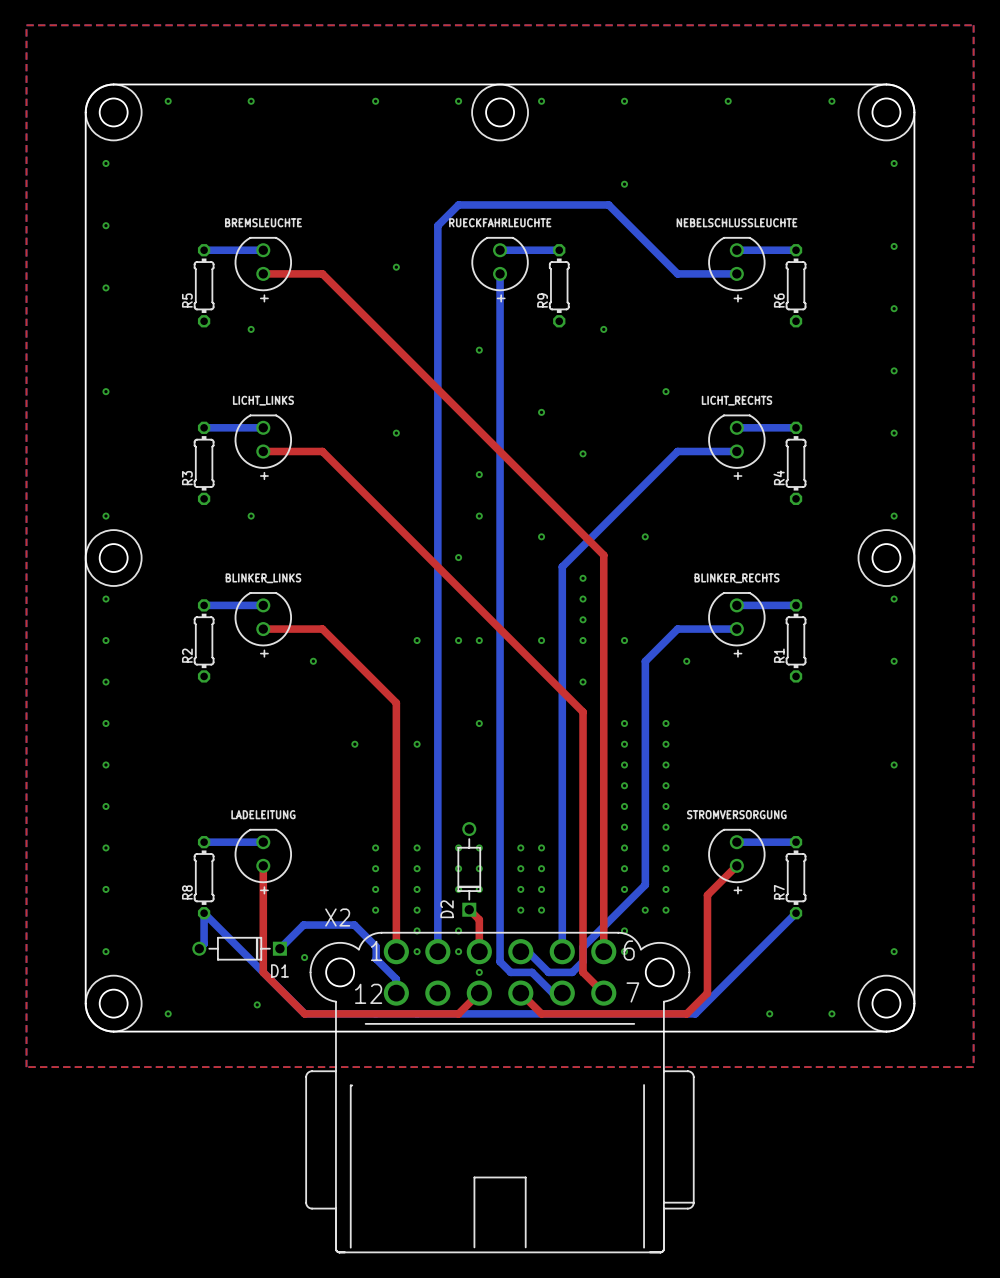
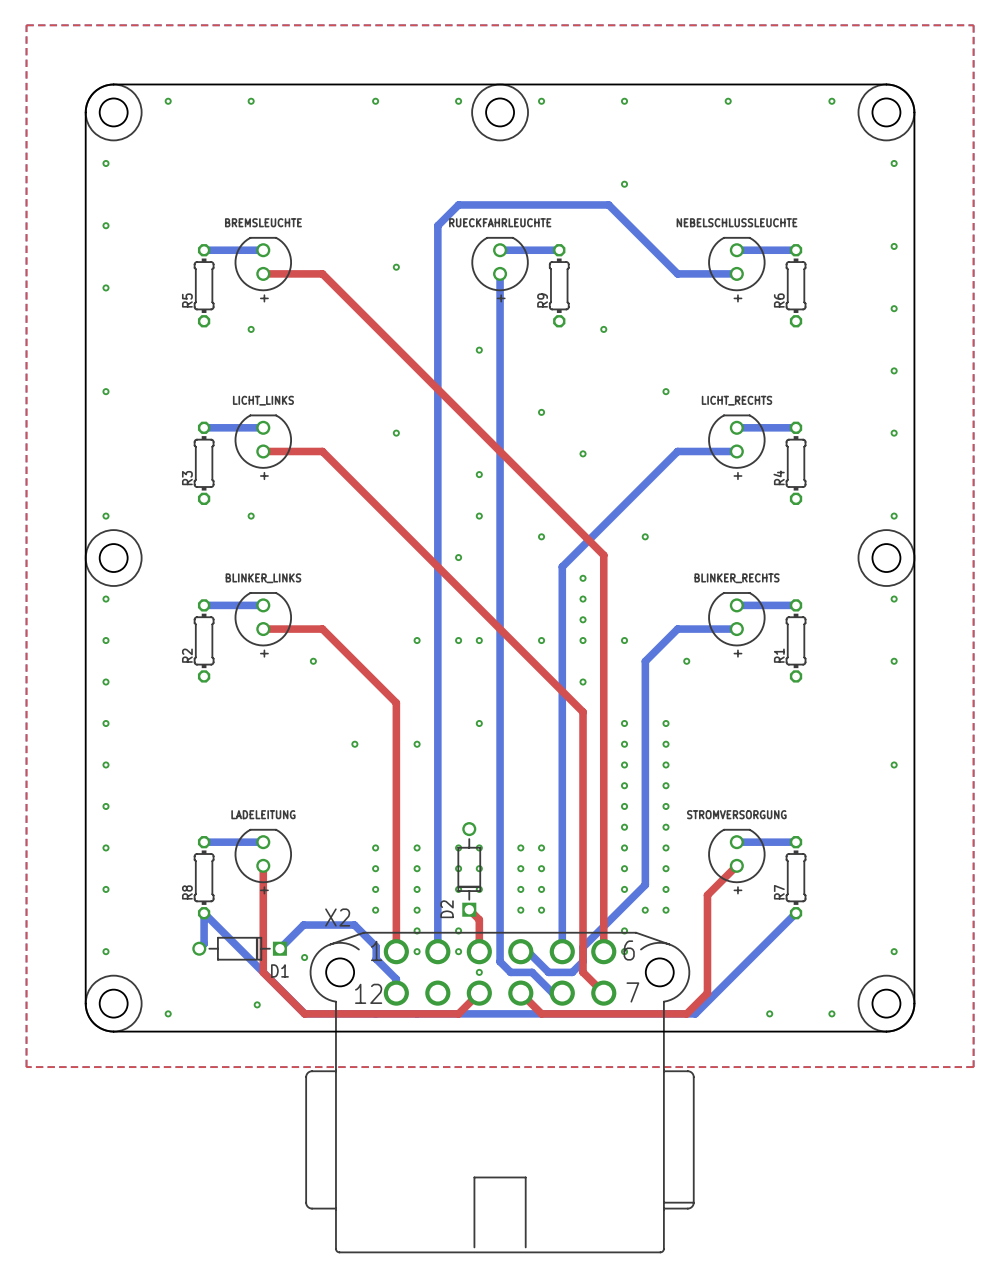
X2 footprint: [305, 932, 695, 1253] -> [305, 932, 695, 1253]

